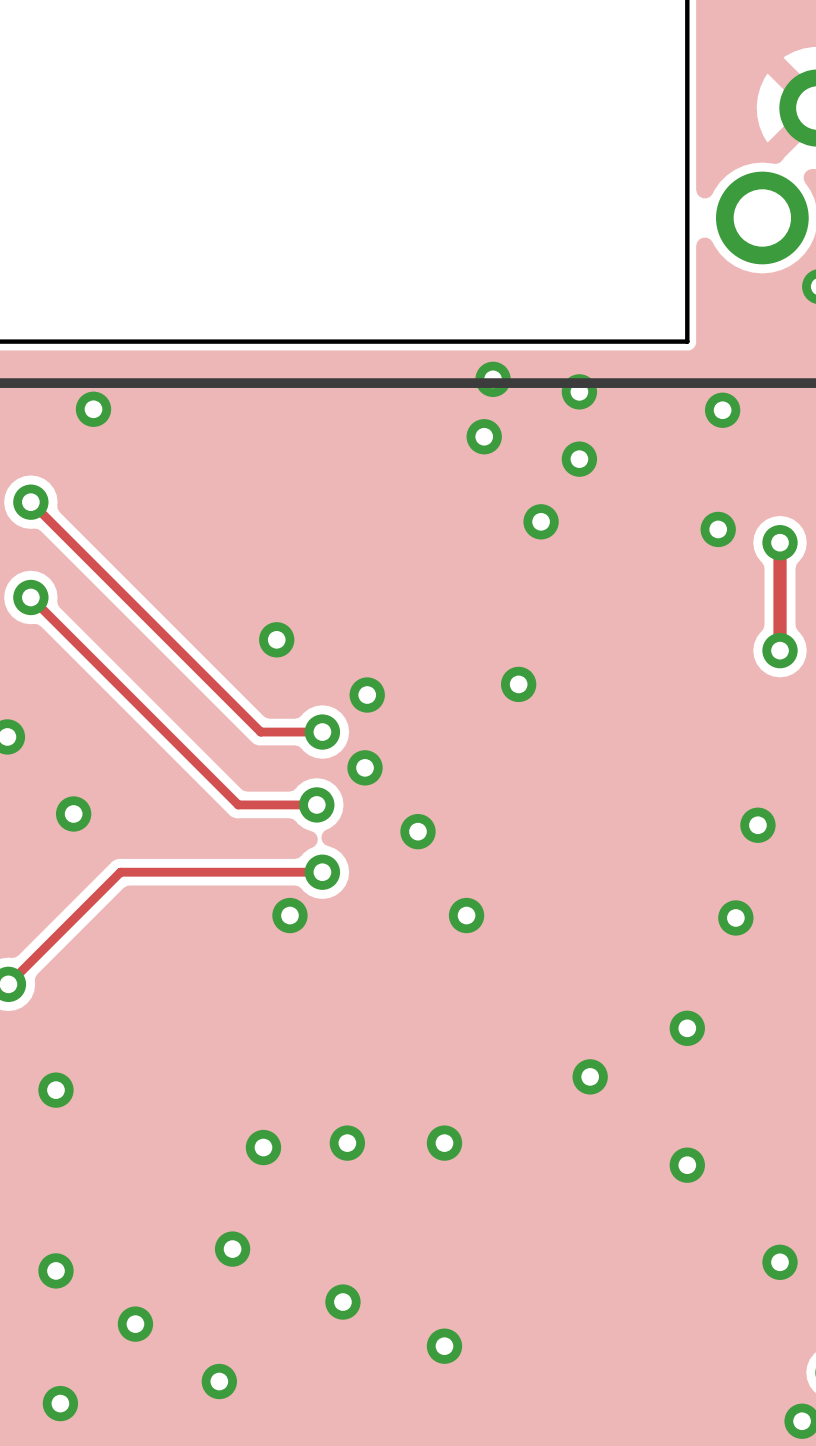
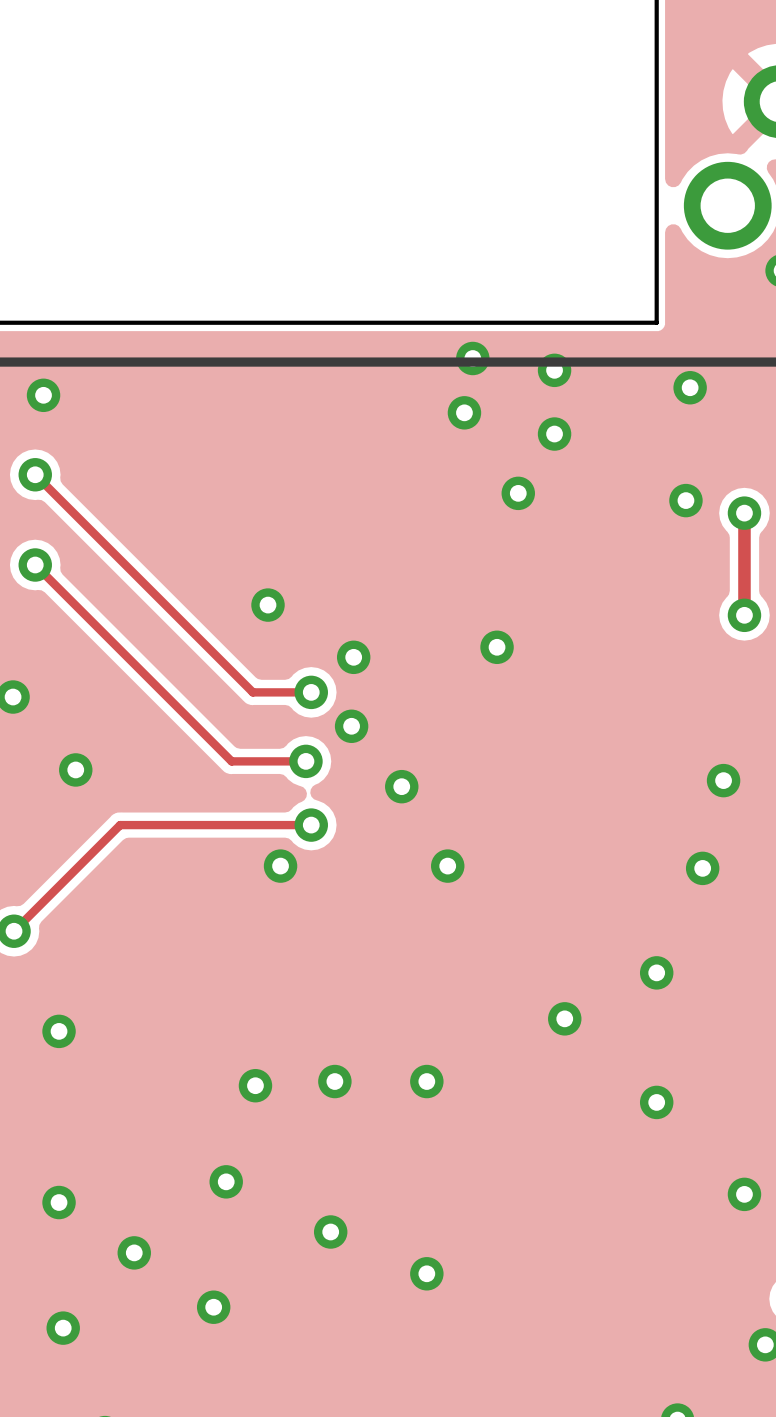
via: (93, 409) -> none
via: none -> (43, 395)

